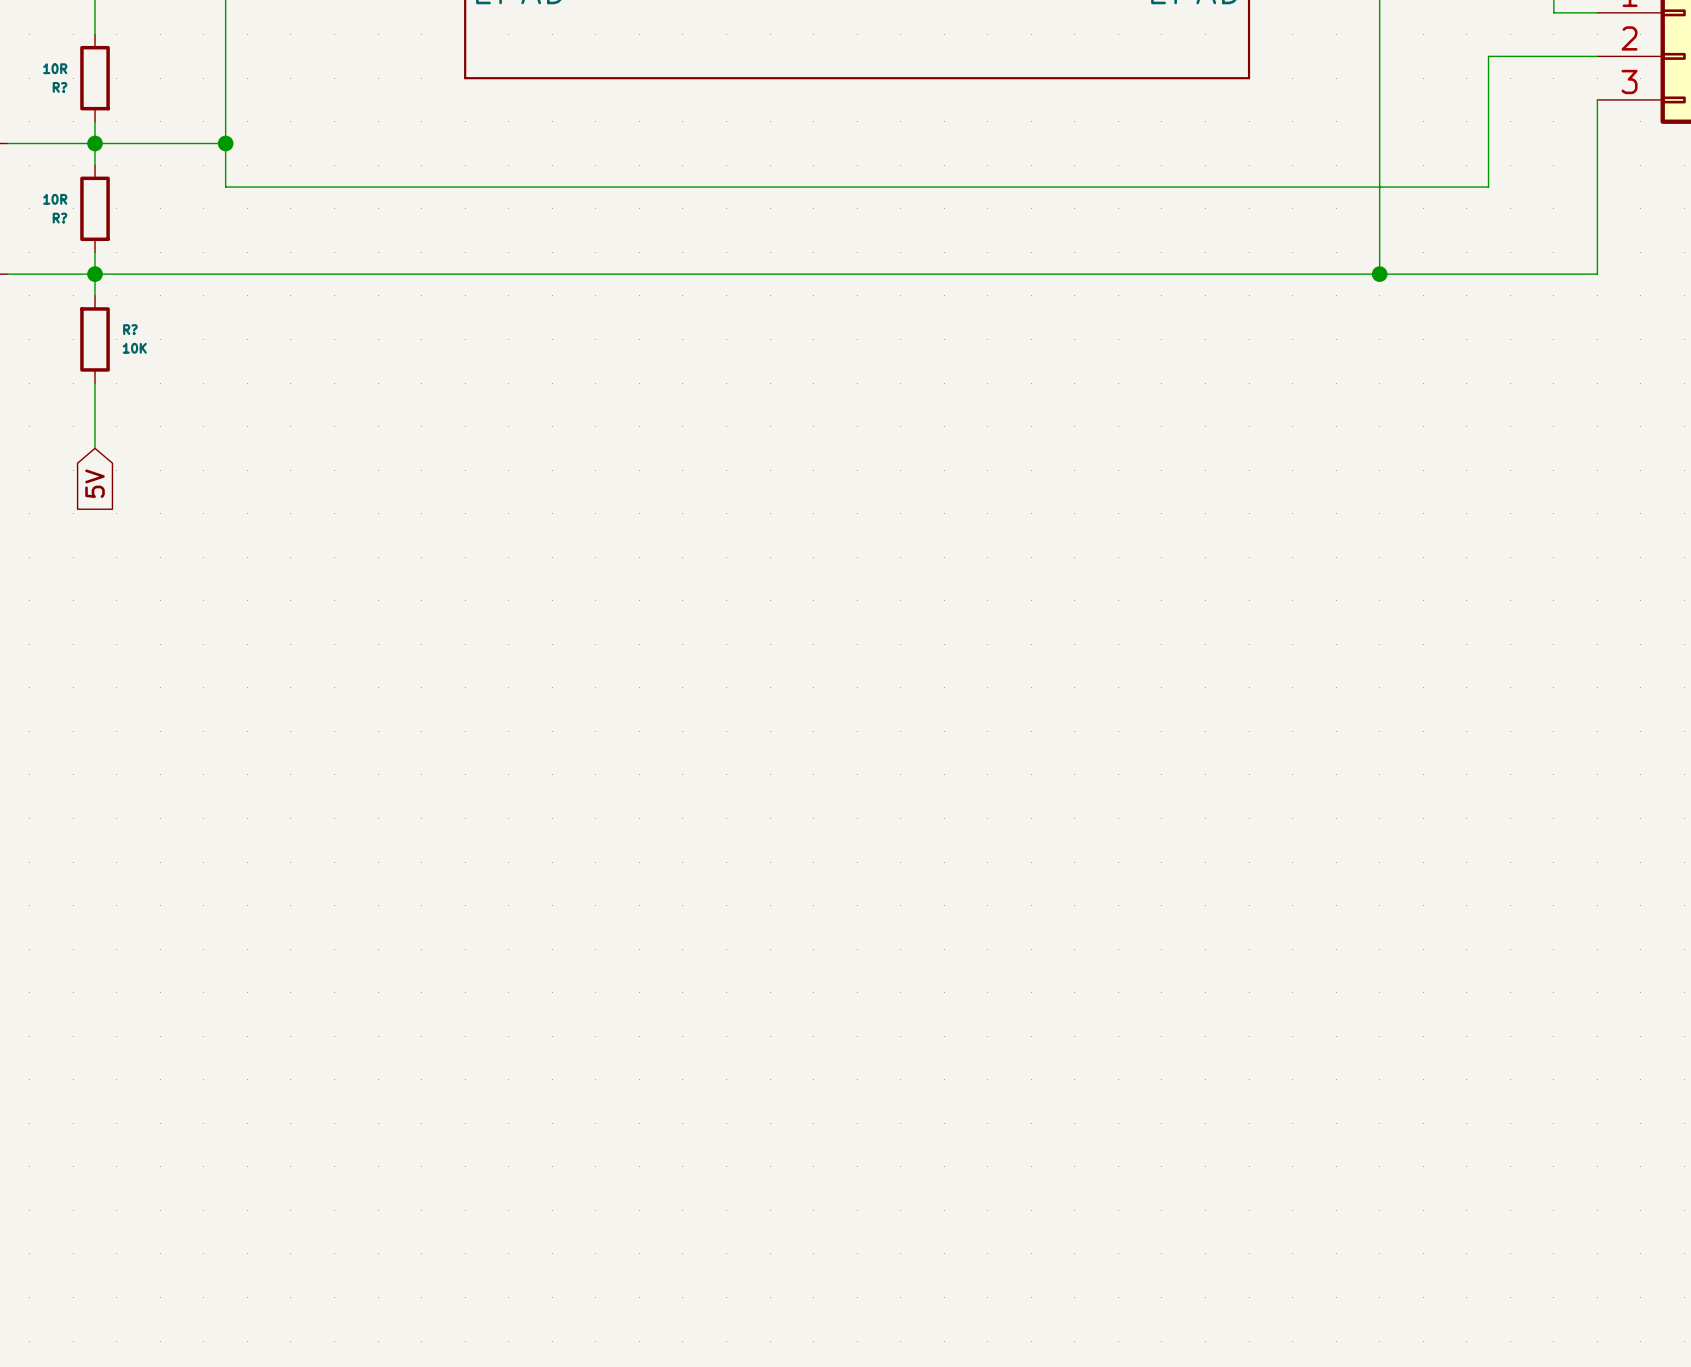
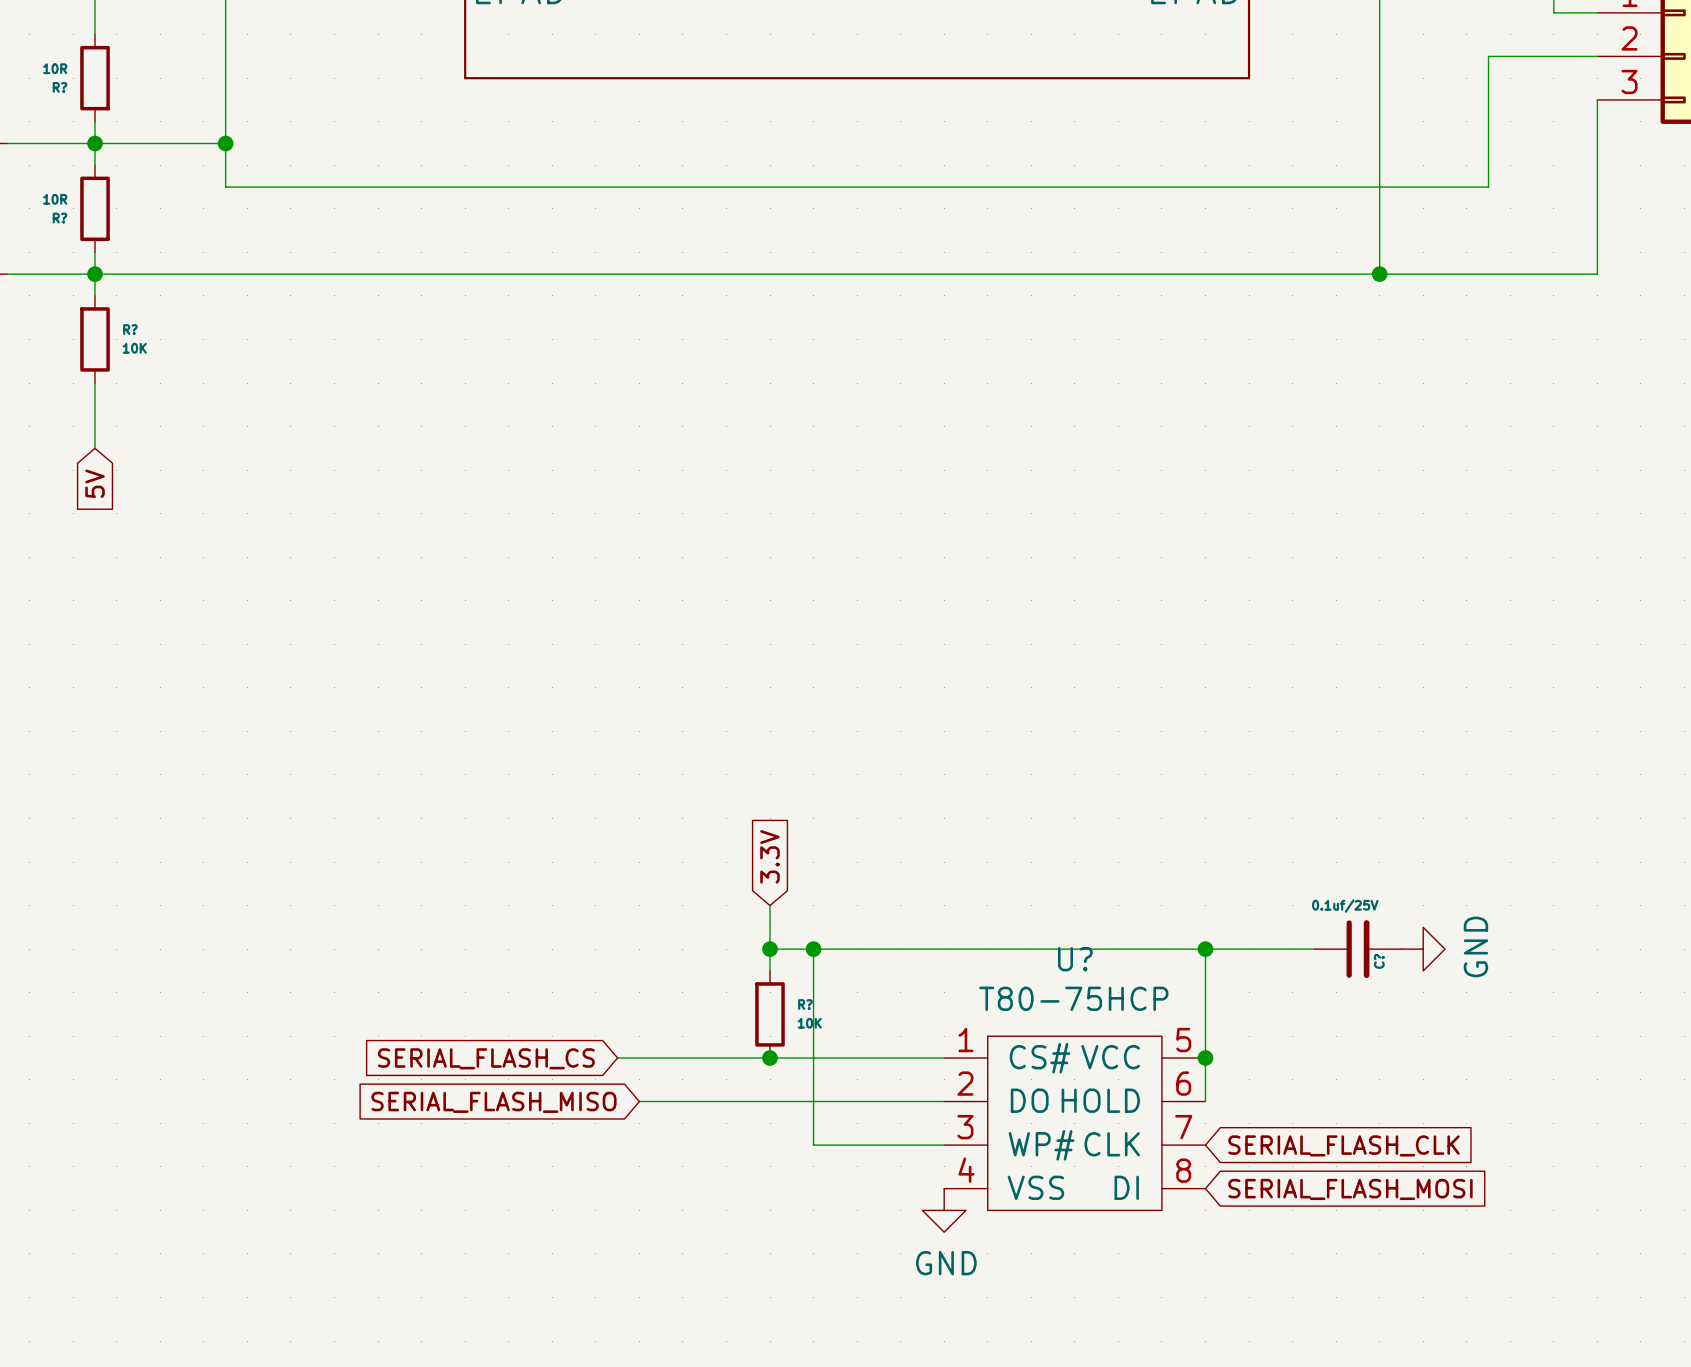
global label: none -> 3.3V (770, 856)
wire: none -> (770, 905) (770, 970)
wire: none -> (770, 949) (1314, 949)
junction: none -> (770, 949)
wire: none -> (813, 949) (813, 1145) (944, 1145)
junction: none -> (813, 949)
wire: none -> (1205, 949) (1205, 1101)
junction: none -> (1205, 949)
C?: none -> 0.1uf/25V (1357, 949)
power symbol: none -> GND (1423, 949)
R?: none -> 10K (770, 1014)
wire: none -> (617, 1057) (944, 1057)
junction: none -> (770, 1057)
junction: none -> (1205, 1057)
global label: none -> SERIAL_FLASH_CS (486, 1058)
wire: none -> (639, 1101) (944, 1101)
global label: none -> SERIAL_FLASH_MISO (493, 1102)
U?: none -> T80-75HCP (1074, 1123)
global label: none -> SERIAL_FLASH_CLK (1343, 1145)
global label: none -> SERIAL_FLASH_MOSI (1350, 1189)
power symbol: none -> GND (944, 1210)

